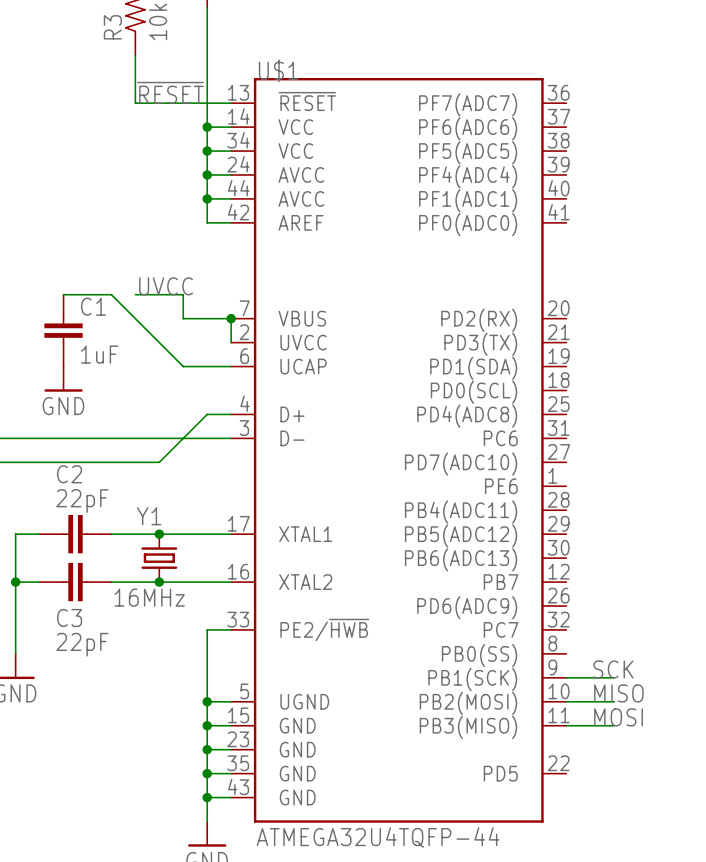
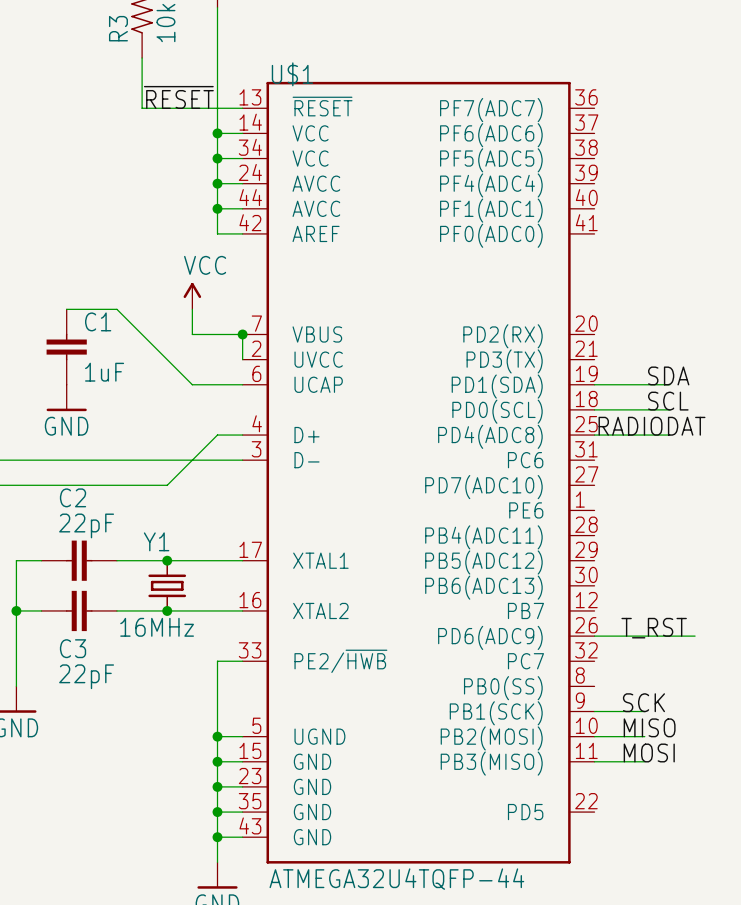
power symbol: none -> VCC (192, 296)
label: UVCC (166, 286) -> none
wire: (135, 294) (183, 294) -> none
label: none -> SDA (668, 375)
wire: none -> (594, 384) (669, 384)
label: none -> SCL (668, 401)
wire: none -> (594, 409) (669, 409)
label: none -> RADIODAT (652, 426)
wire: none -> (594, 435) (669, 435)
label: none -> T_RST (654, 628)
wire: none -> (594, 636) (695, 636)

